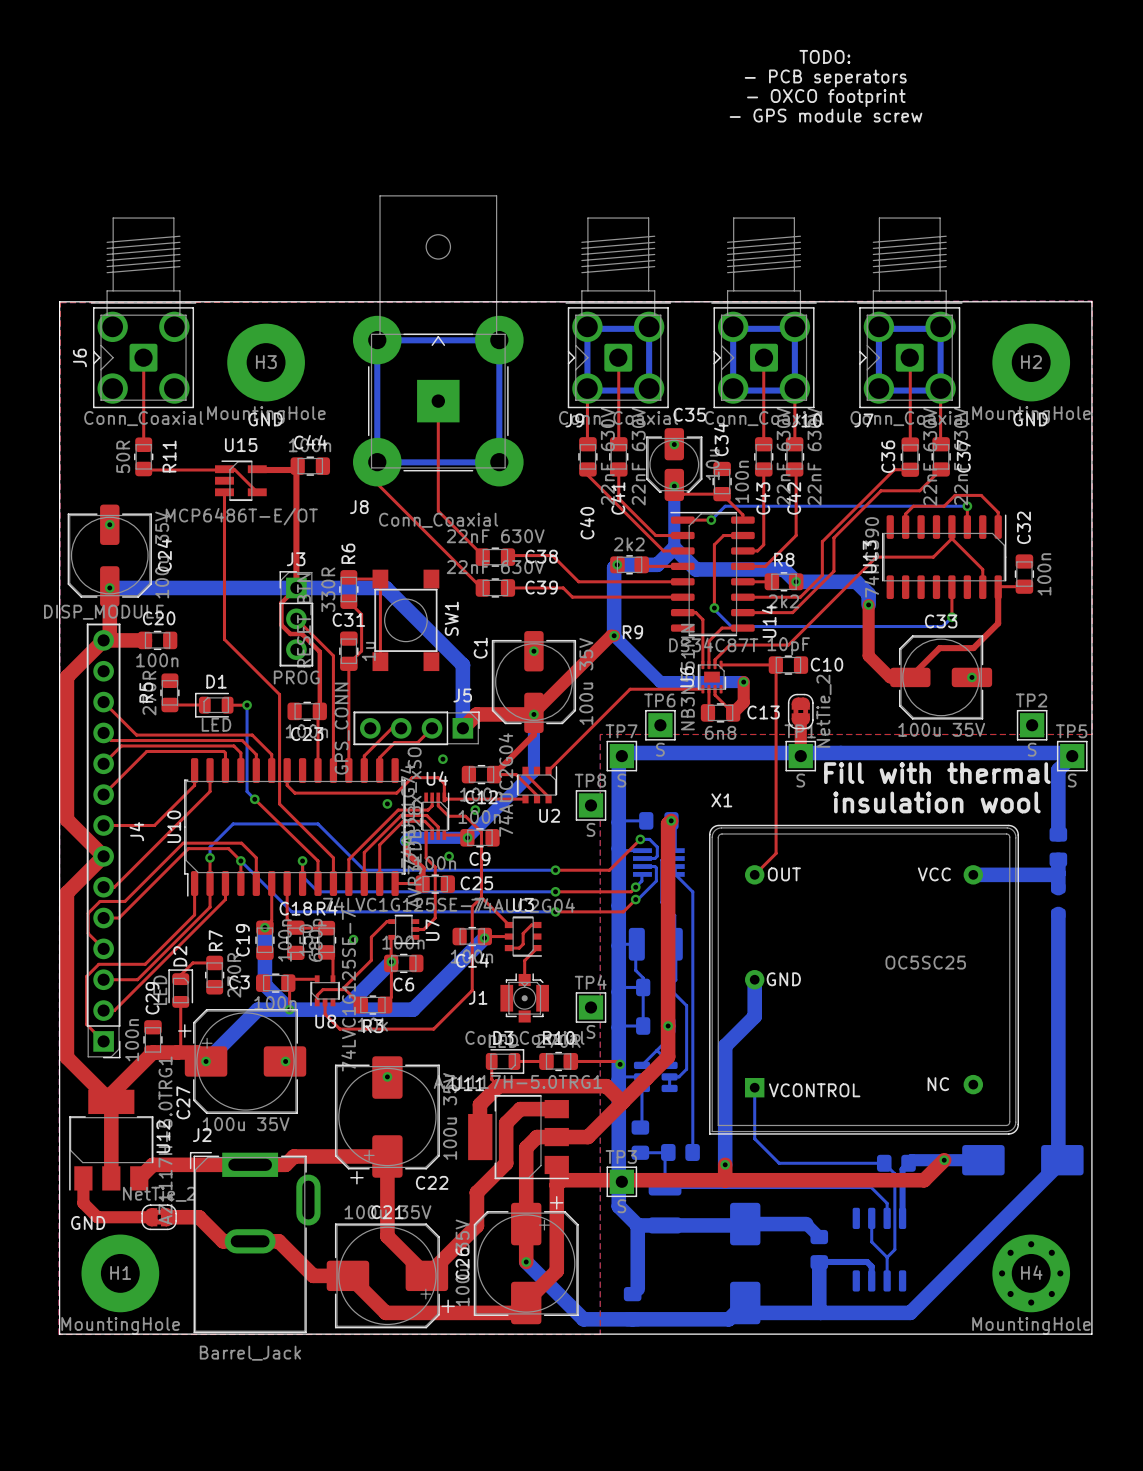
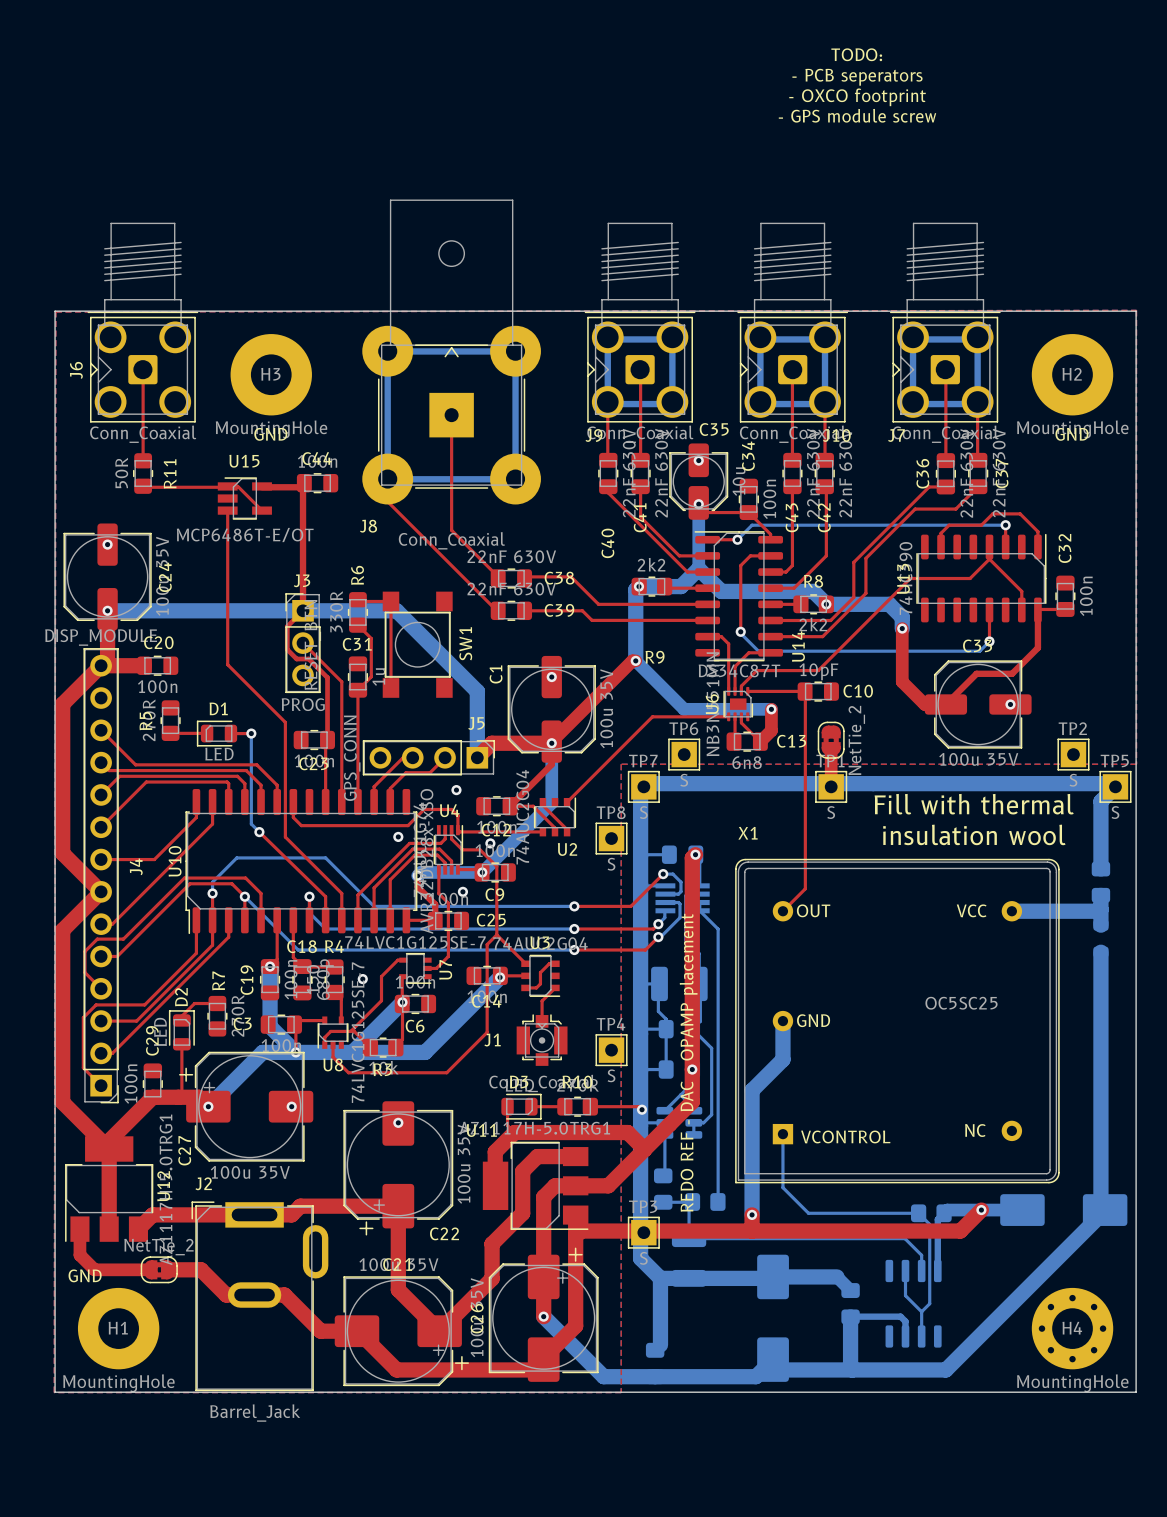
text: none -> REDO REF - DAC - OPAMP placement (688, 1062)

